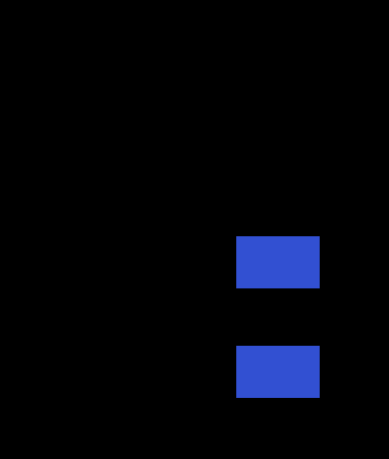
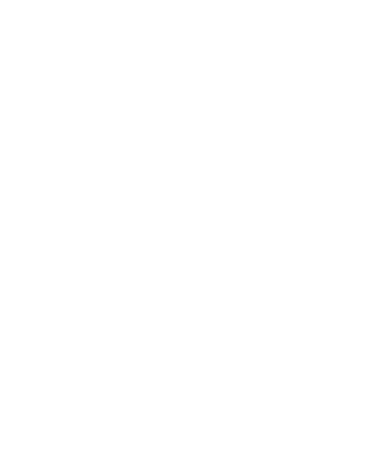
part: (277, 317) -> none

